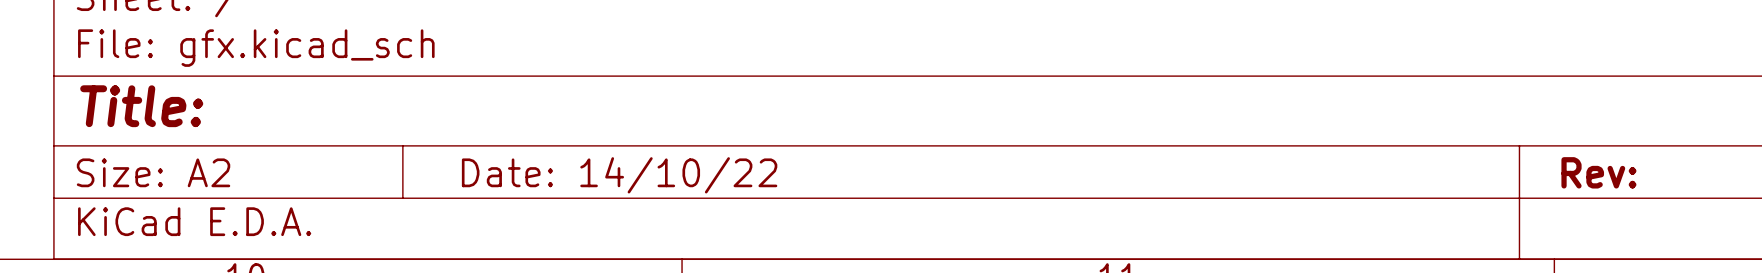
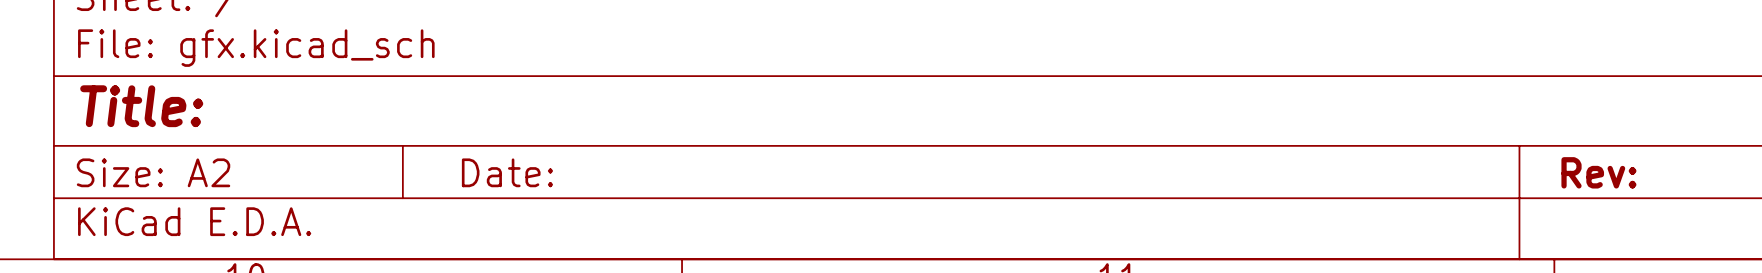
title block: Date: 14/10/22 (619, 175) -> Date: (507, 172)

